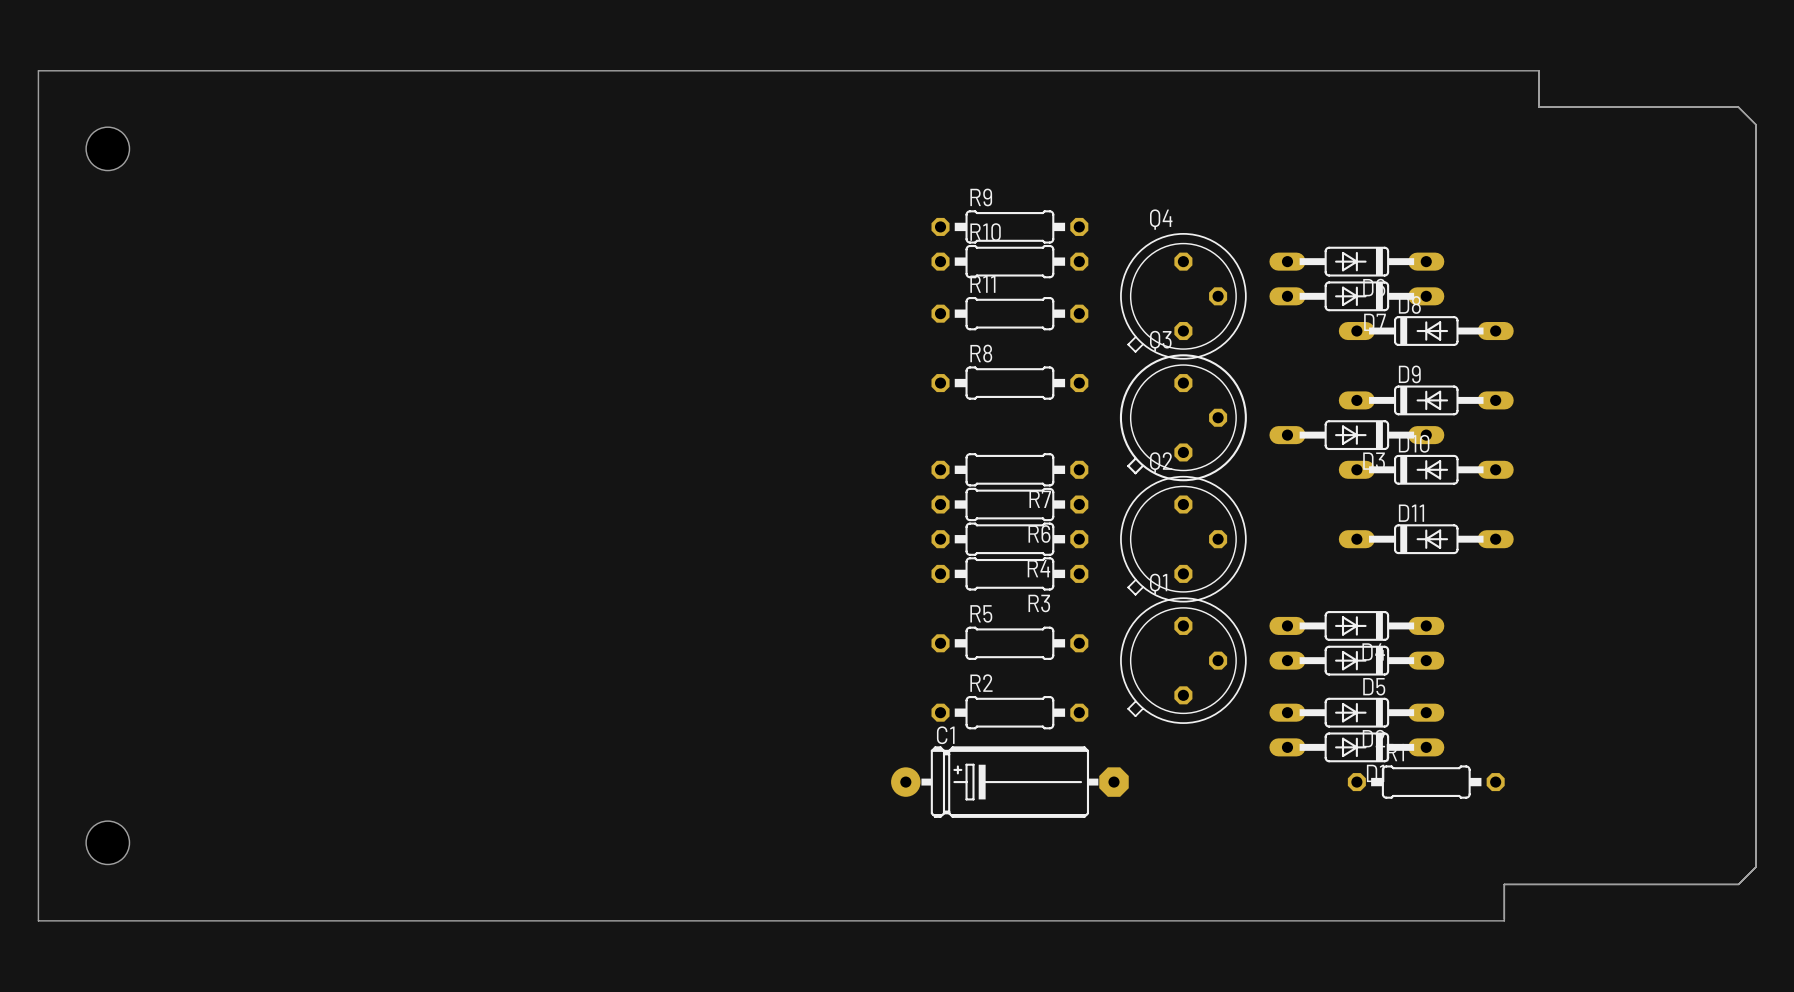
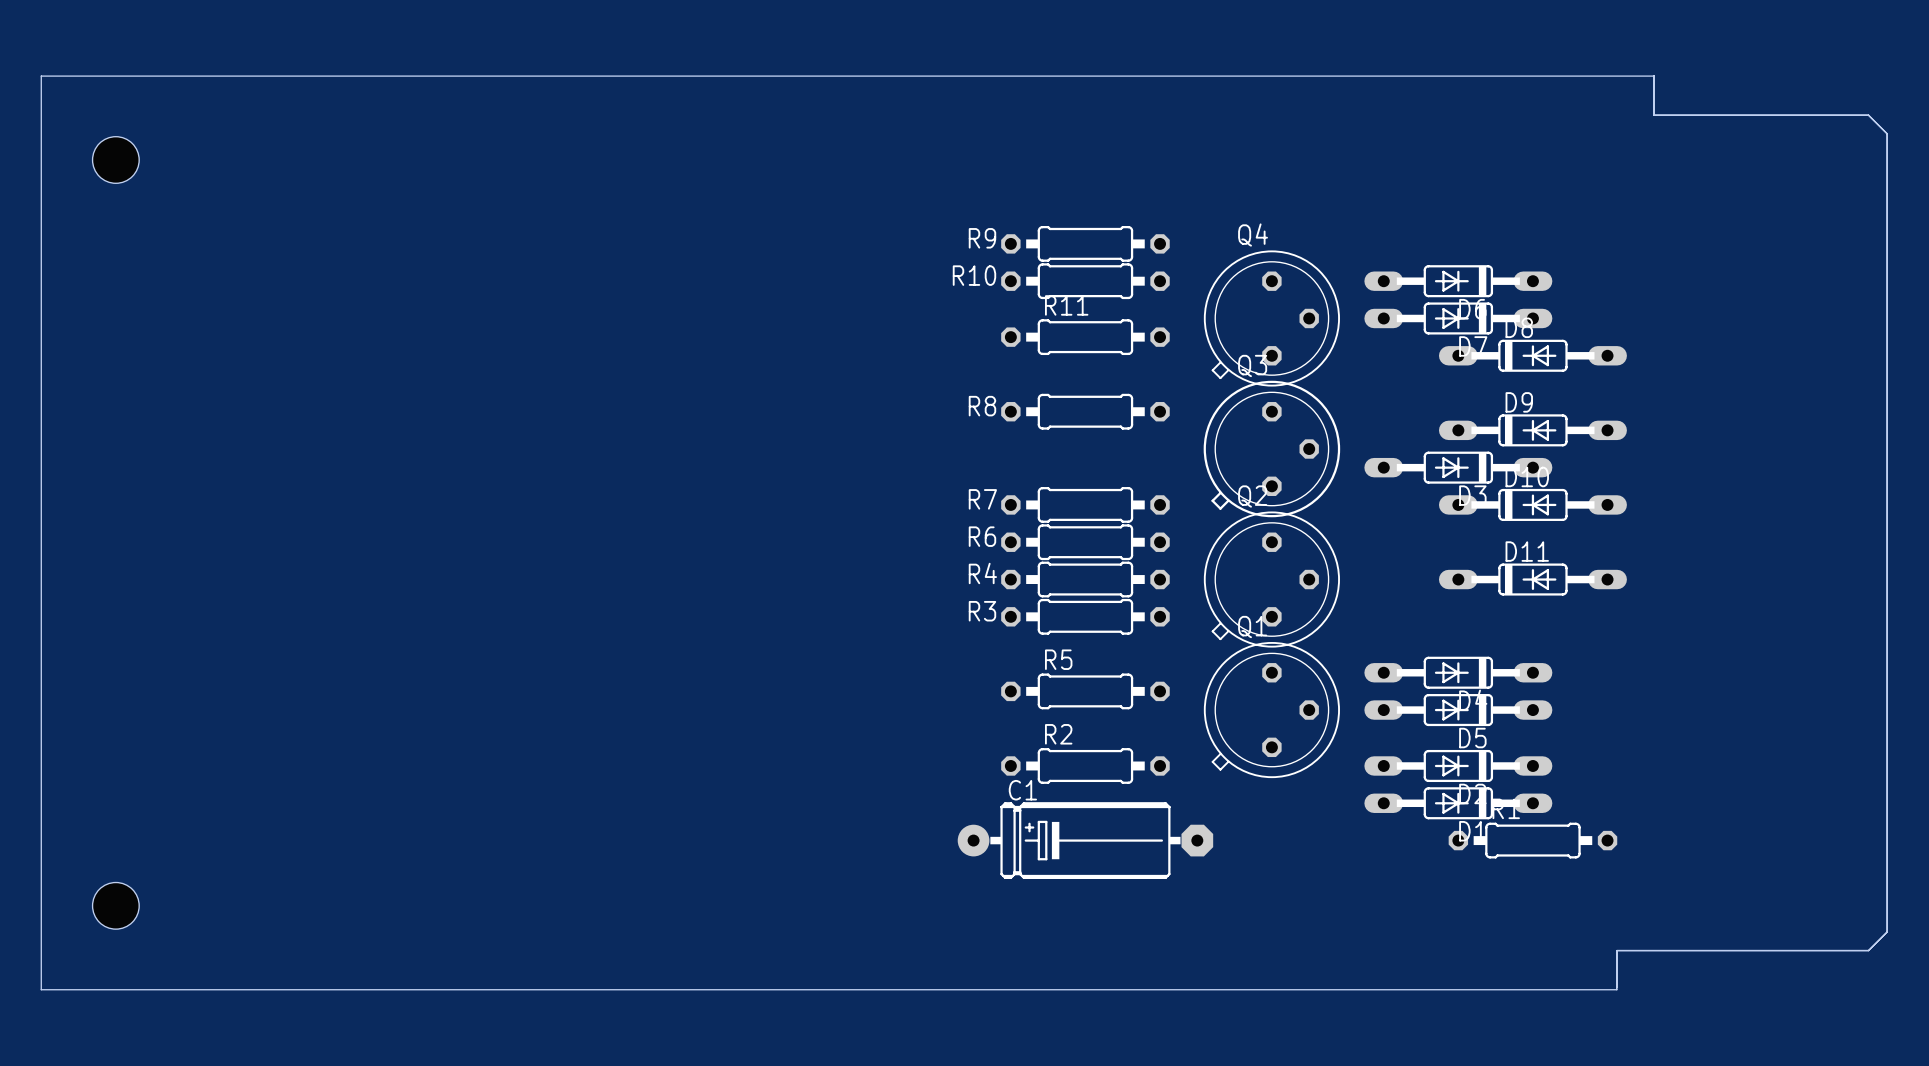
R9 name position: R9 (981, 197) -> R9 (982, 238)
R10 name position: R10 (985, 232) -> R10 (974, 275)
R8 name position: R8 (981, 353) -> R8 (982, 406)
R7 name position: R7 (1040, 499) -> R7 (982, 499)
R6 name position: R6 (1039, 533) -> R6 (982, 536)
R4 name position: R4 (1038, 568) -> R4 (982, 573)
R3 name position: R3 (1039, 603) -> R3 (982, 611)

